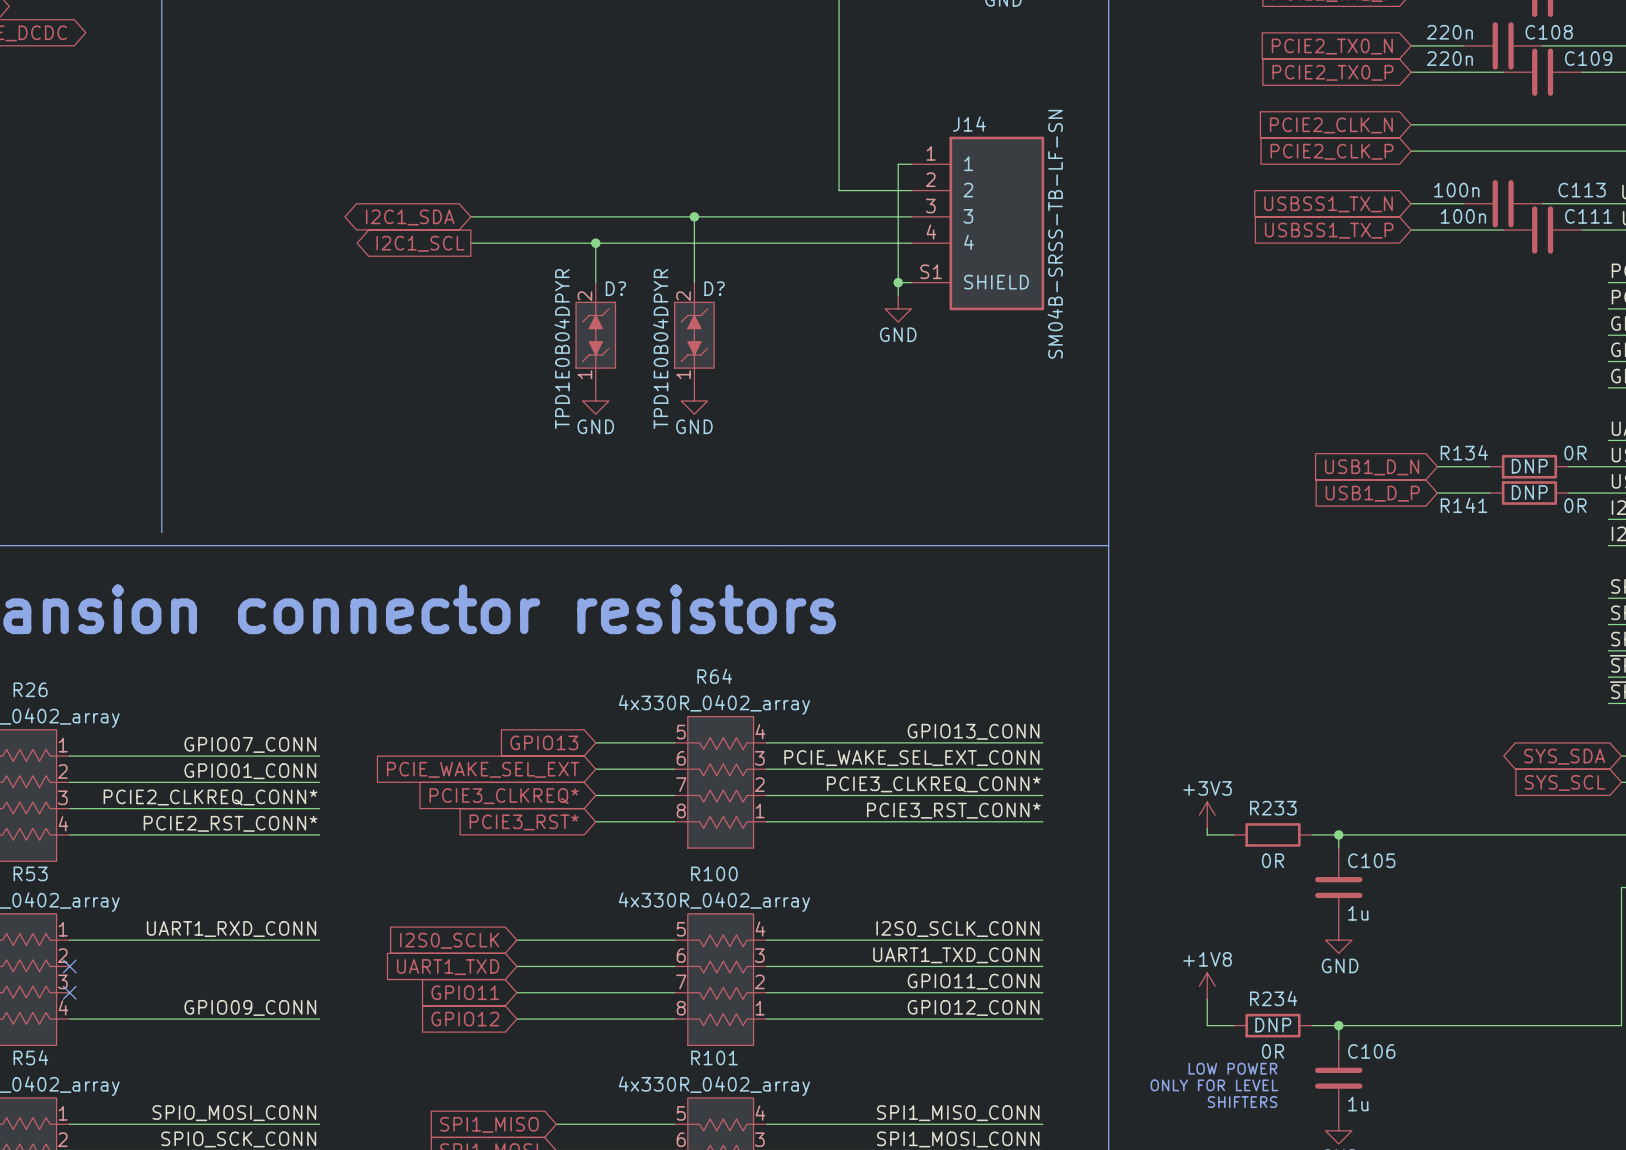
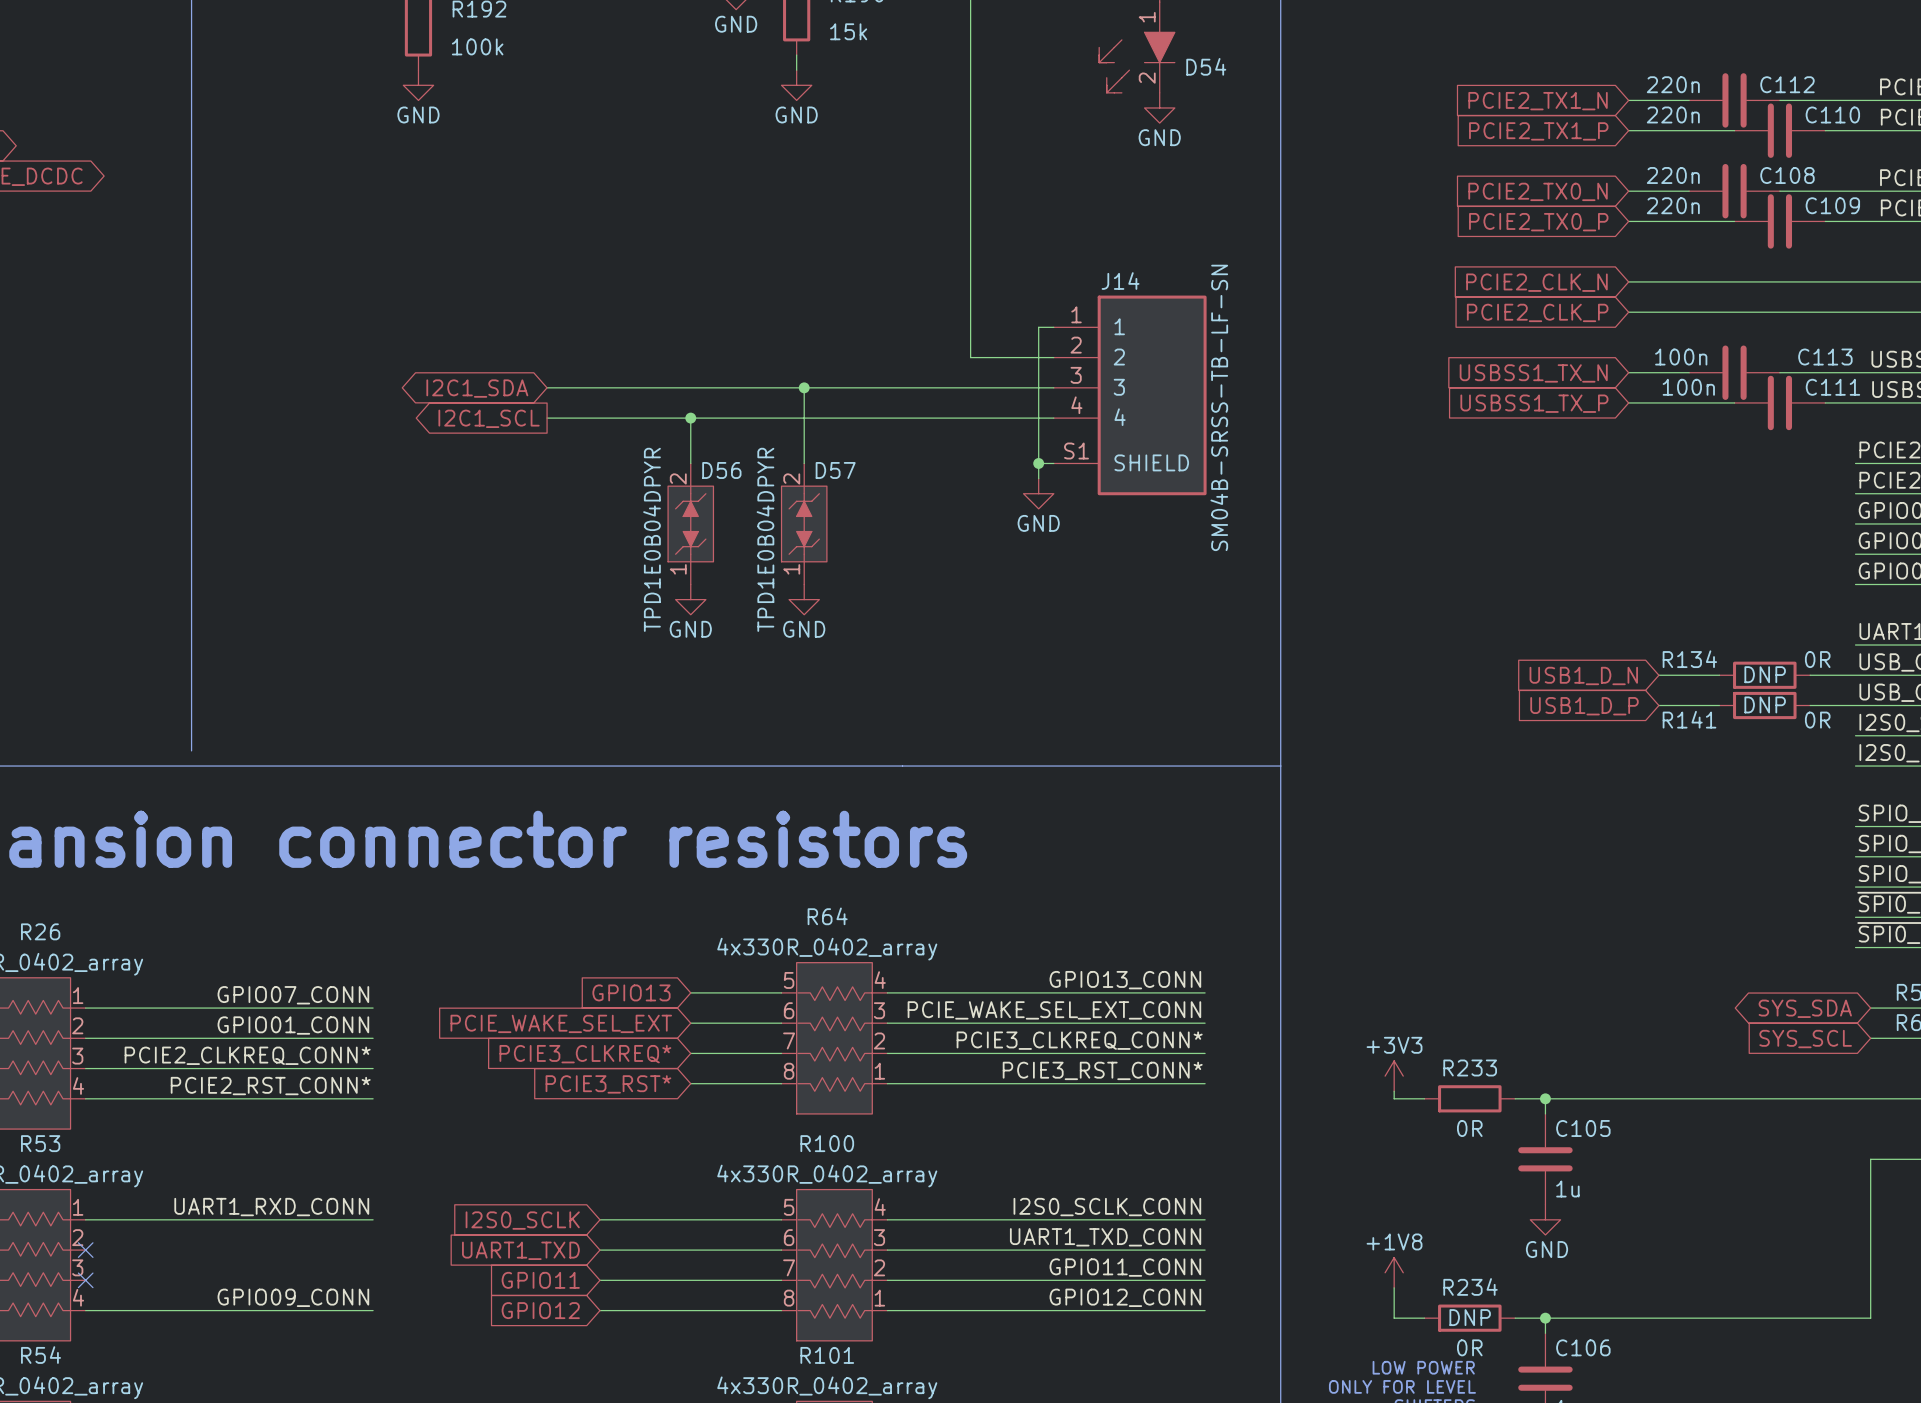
D? name: D? (615, 288) -> D56 (721, 470)
D? name: D? (714, 288) -> D57 (835, 470)

